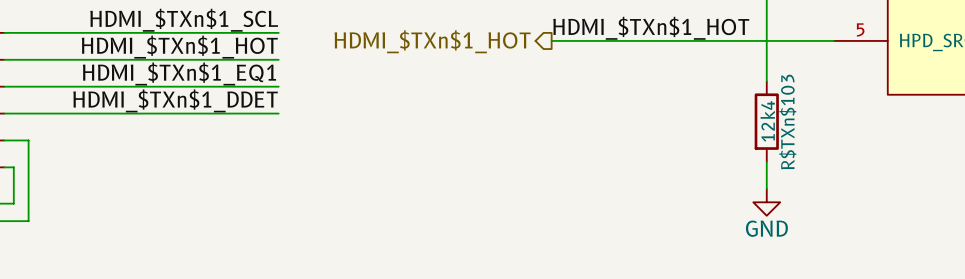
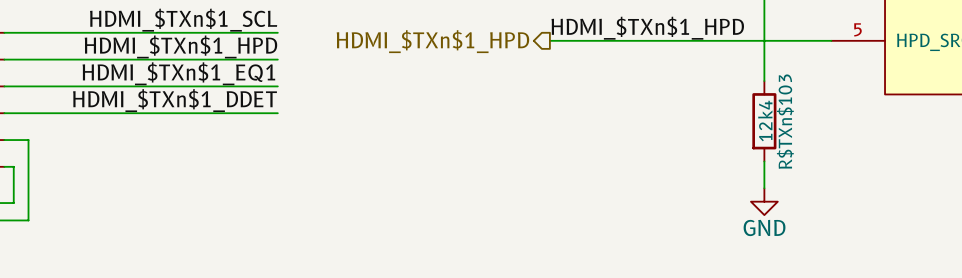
label: HDMI_$TXn$1_HOT (651, 28) -> HDMI_$TXn$1_HPD (647, 28)
hierarchical label: HDMI_$TXn$1_HOT (432, 41) -> HDMI_$TXn$1_HPD (432, 41)
label: HDMI_$TXn$1_HOT (179, 47) -> HDMI_$TXn$1_HPD (180, 46)

